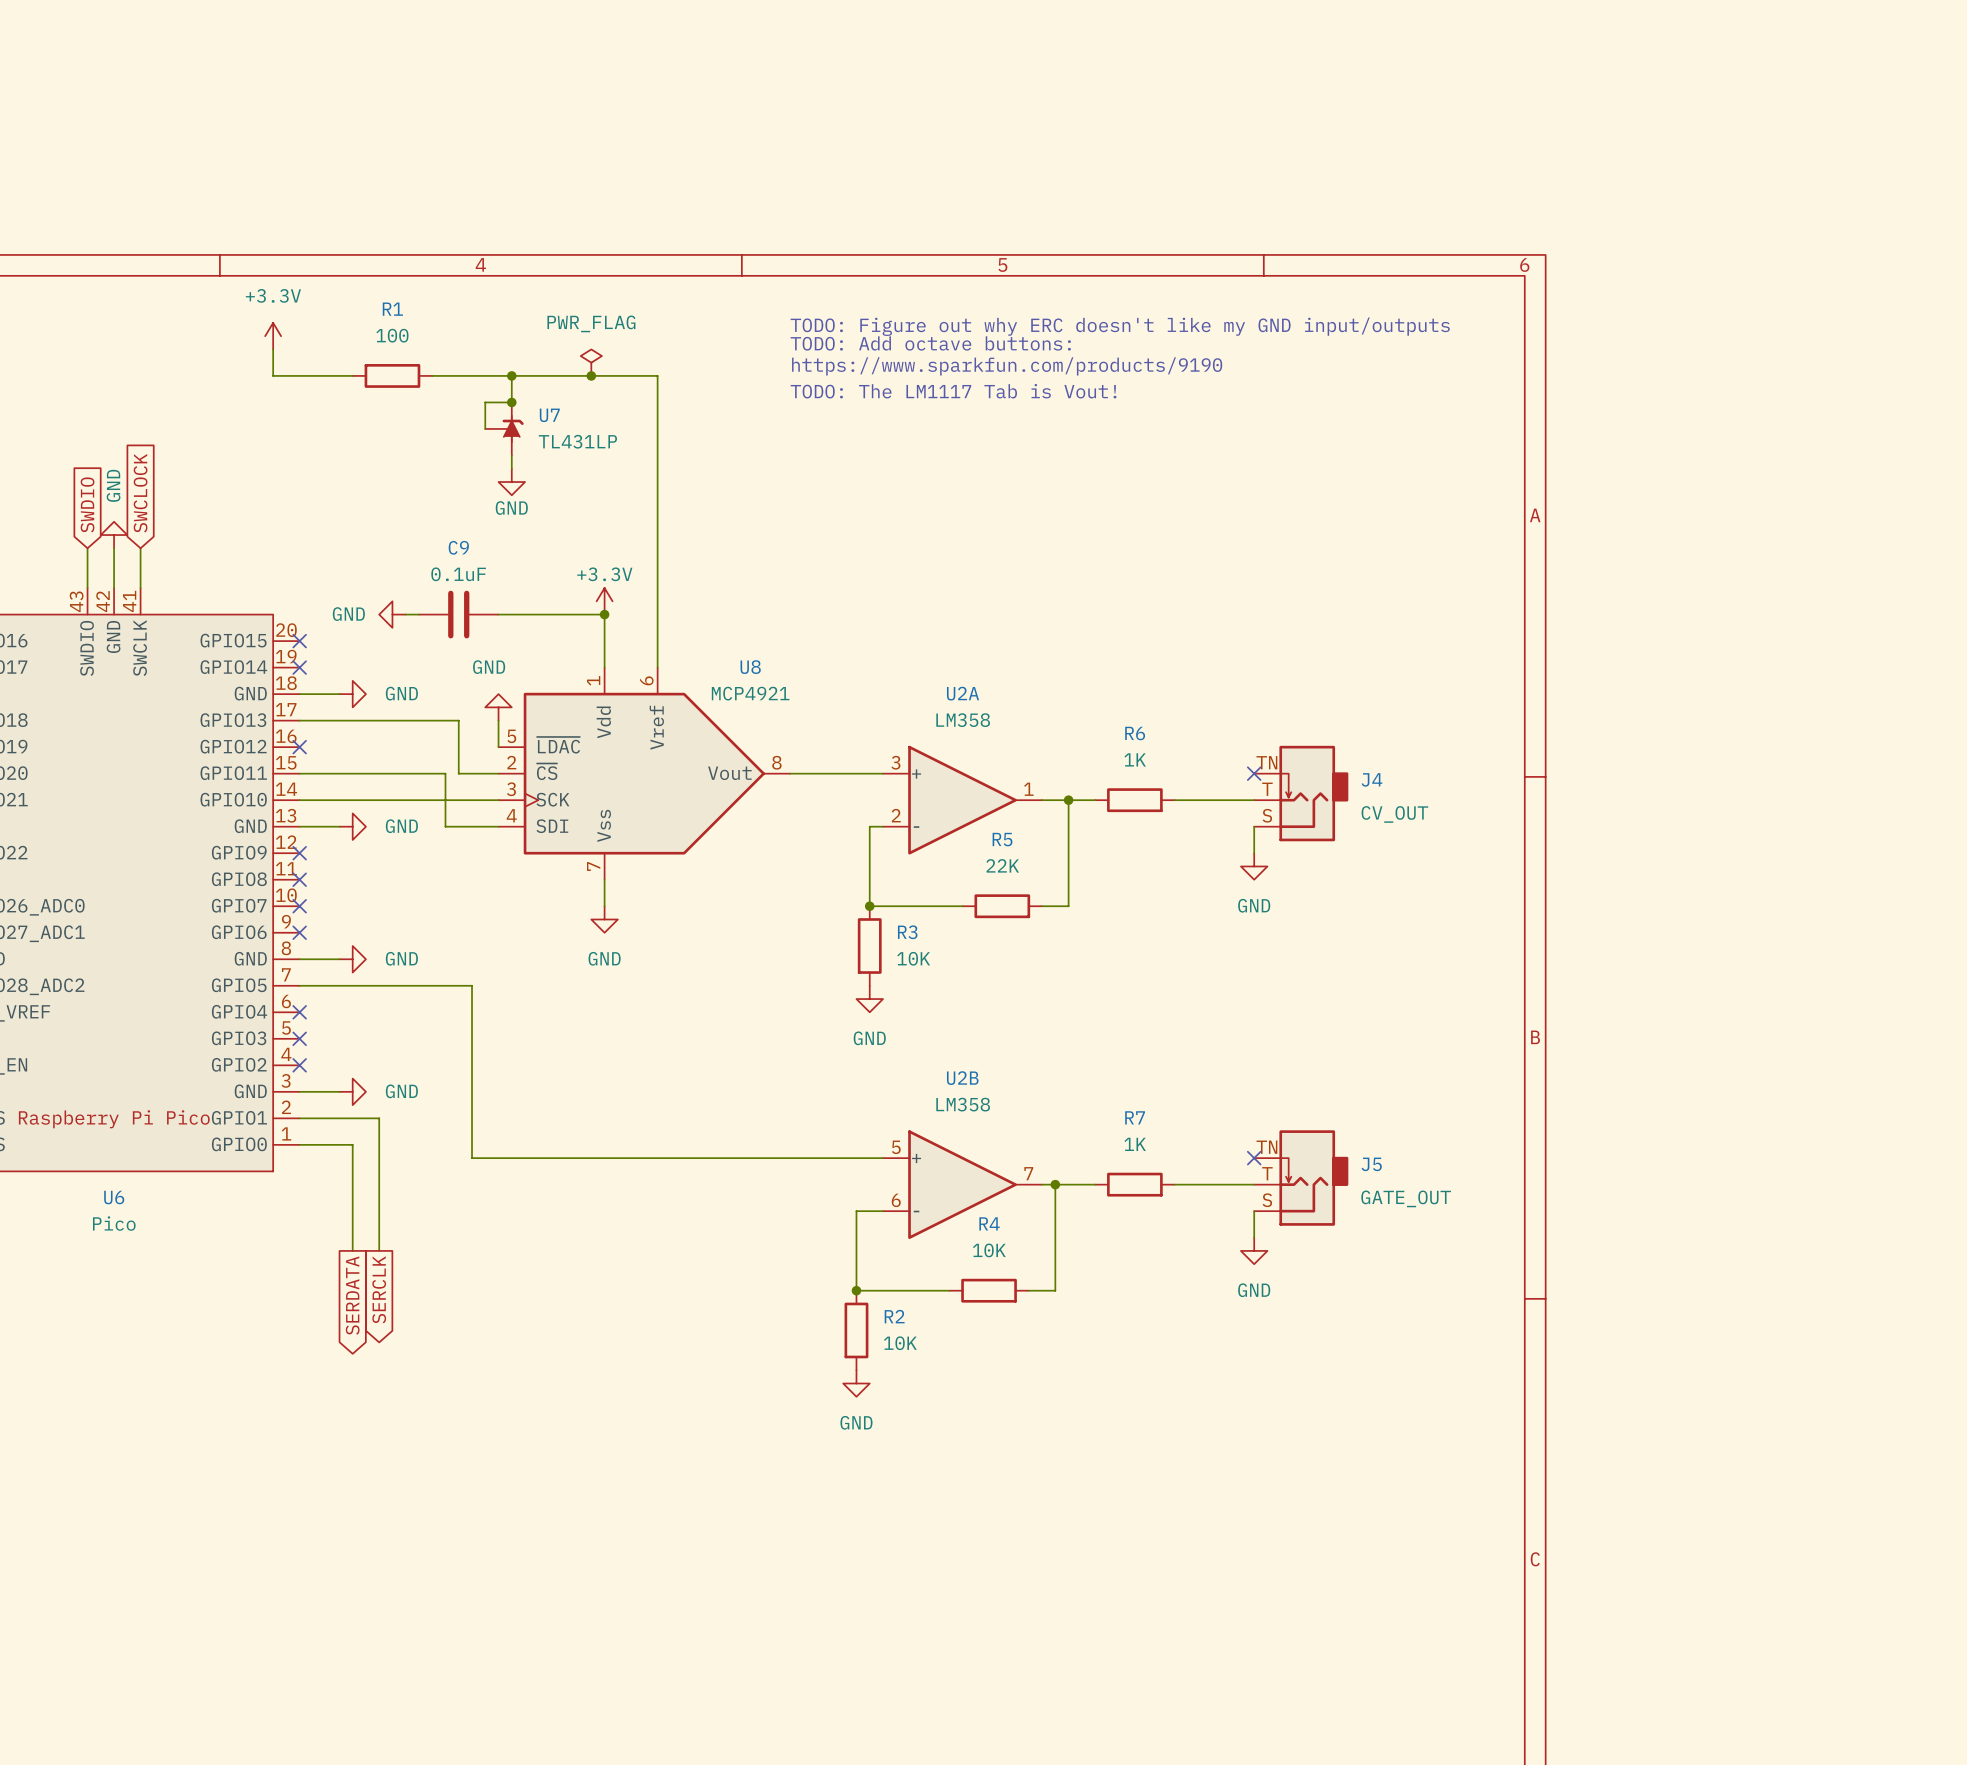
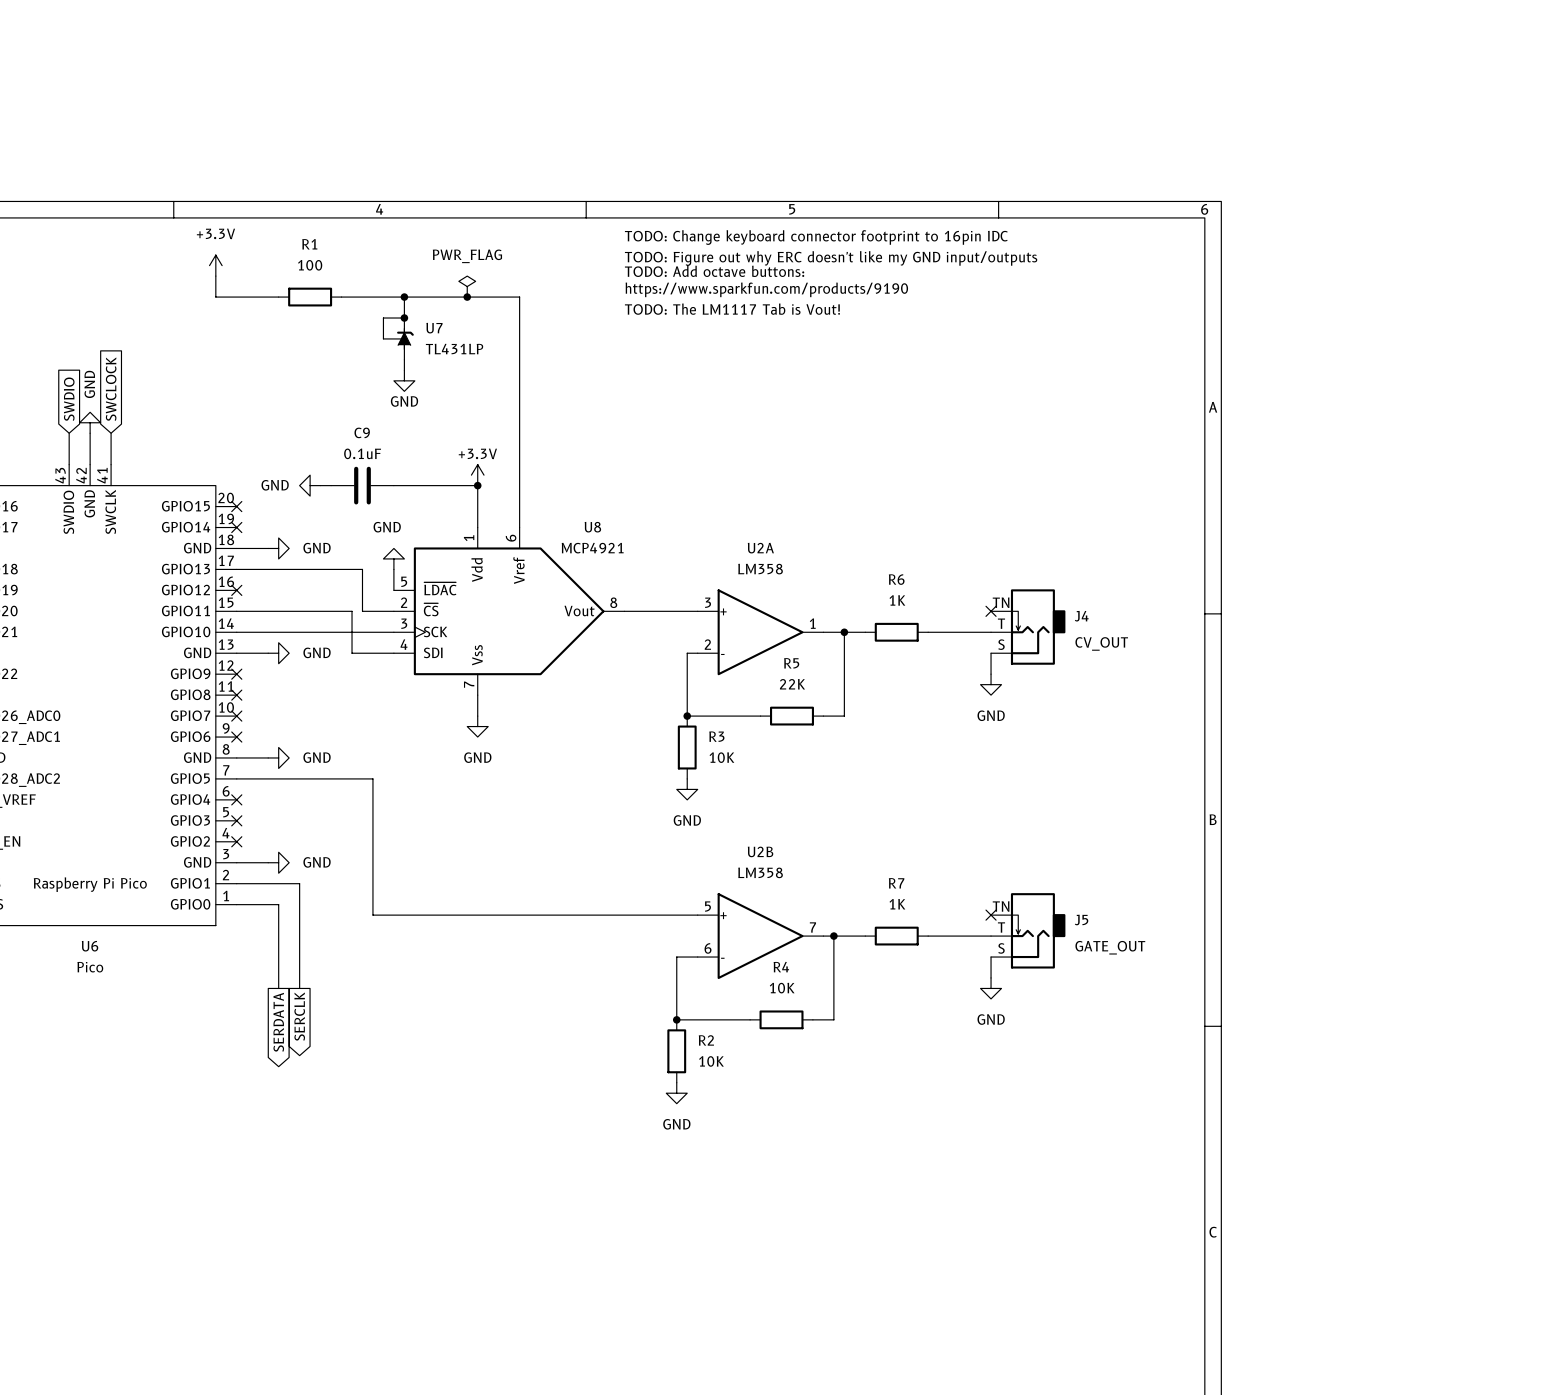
text: none -> TODO: Change keyboard connector footprint to 16pin IDC (816, 237)

